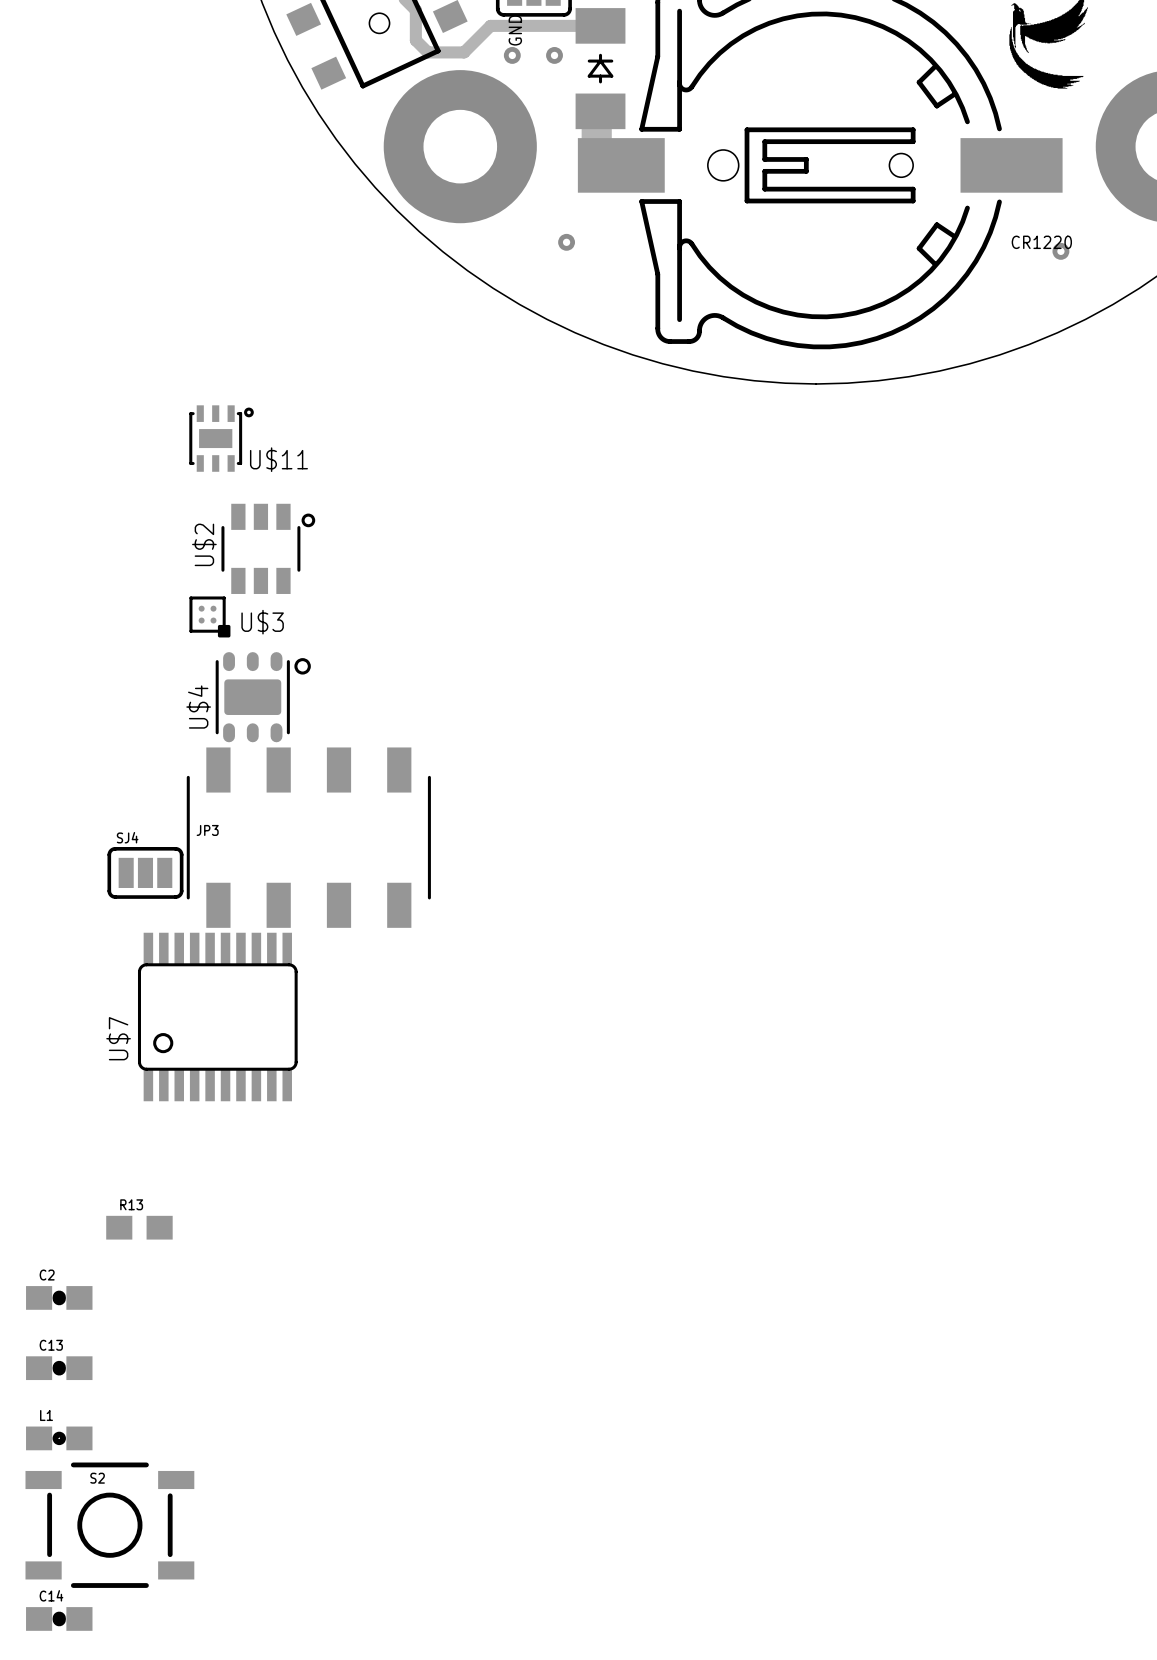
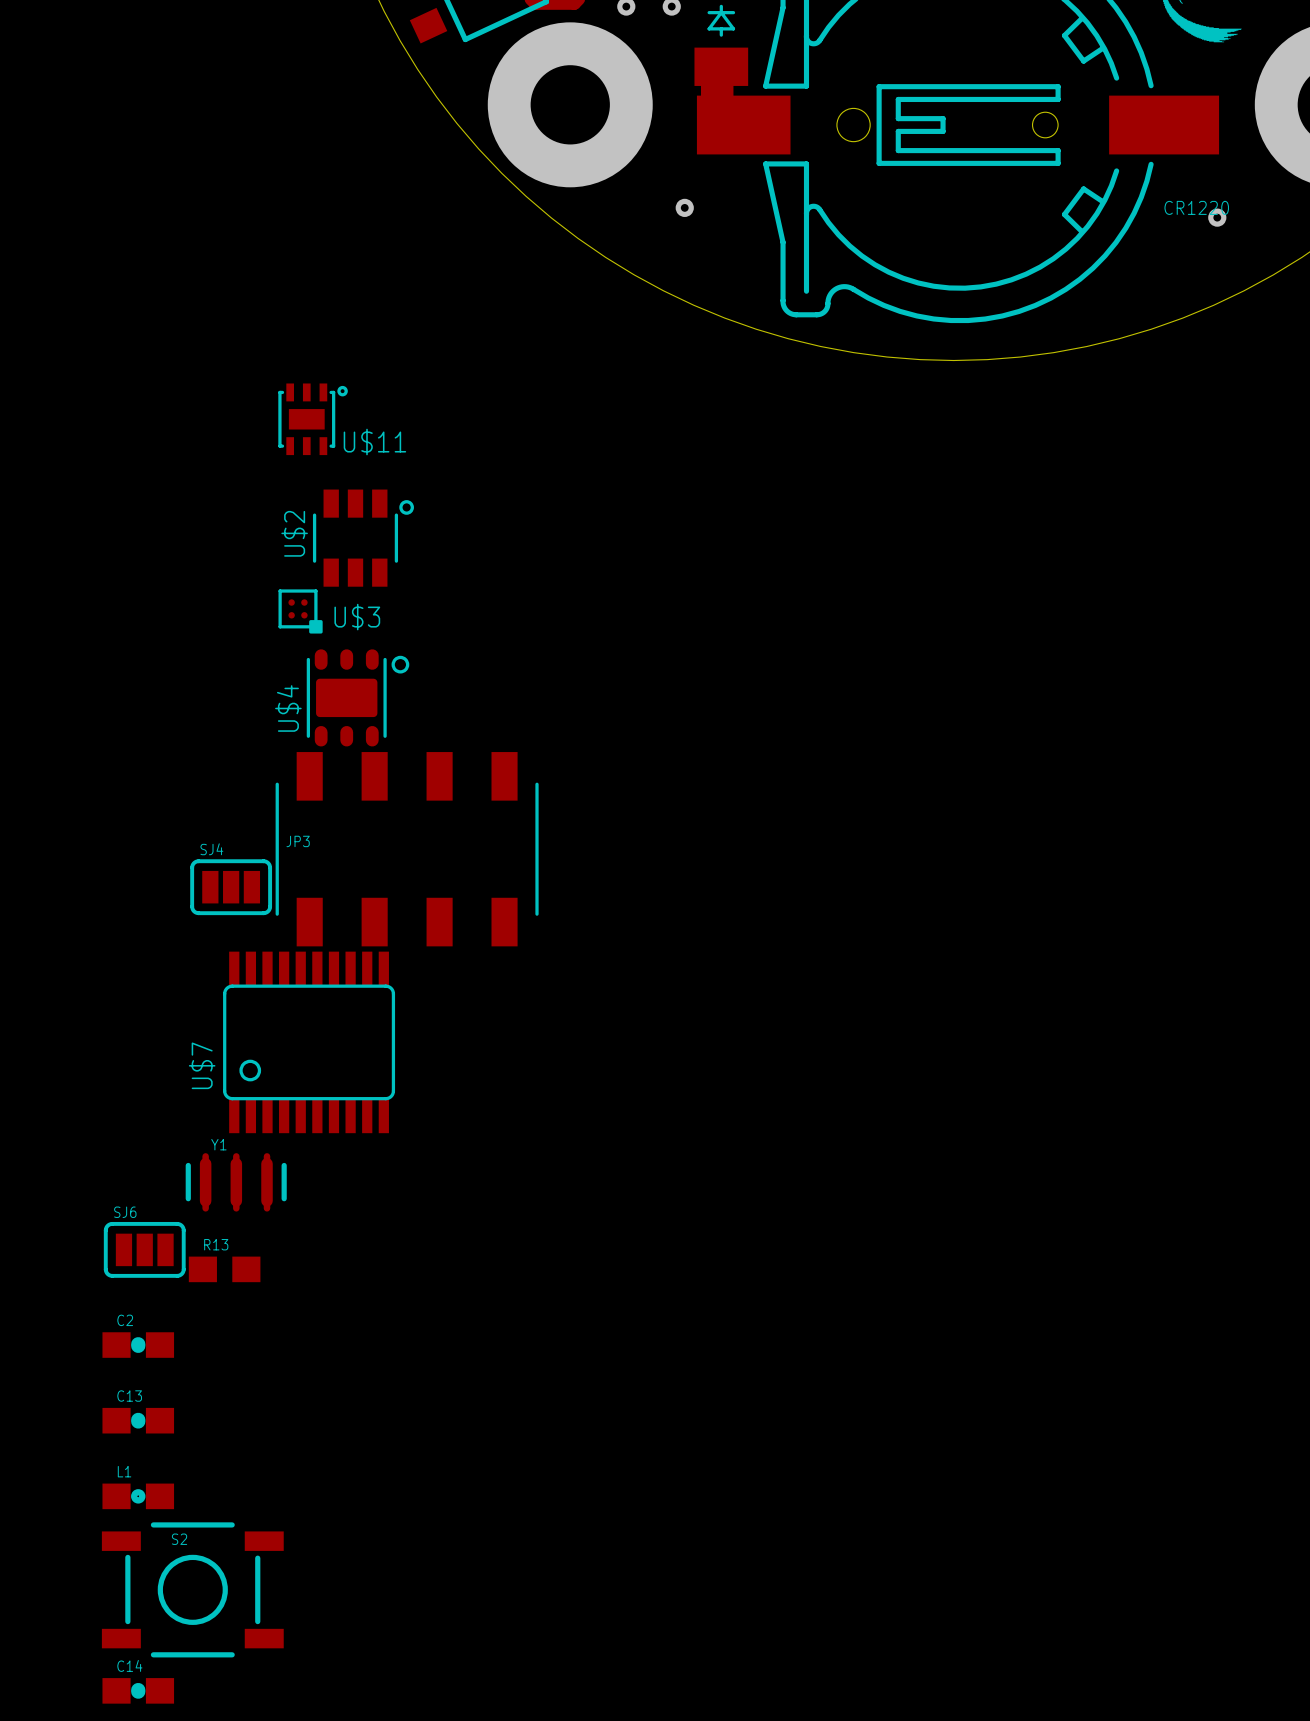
Y1: none -> (236, 1182)
SJ6: none -> (144, 1249)

